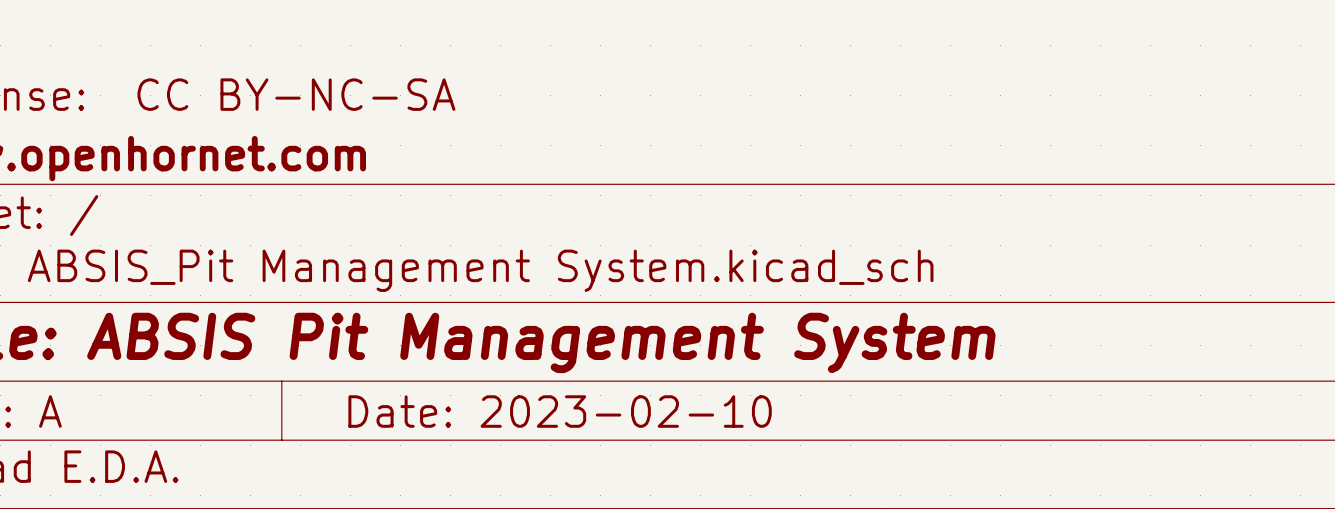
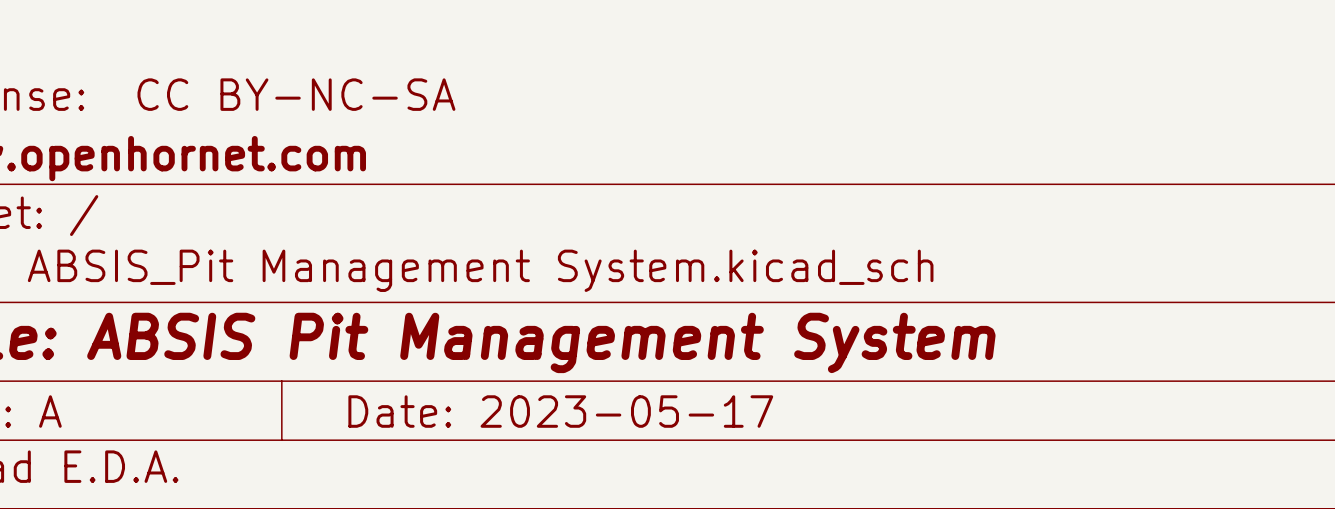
title block: Date: 2023-02-10 (560, 411) -> Date: 2023-05-17 (560, 411)

